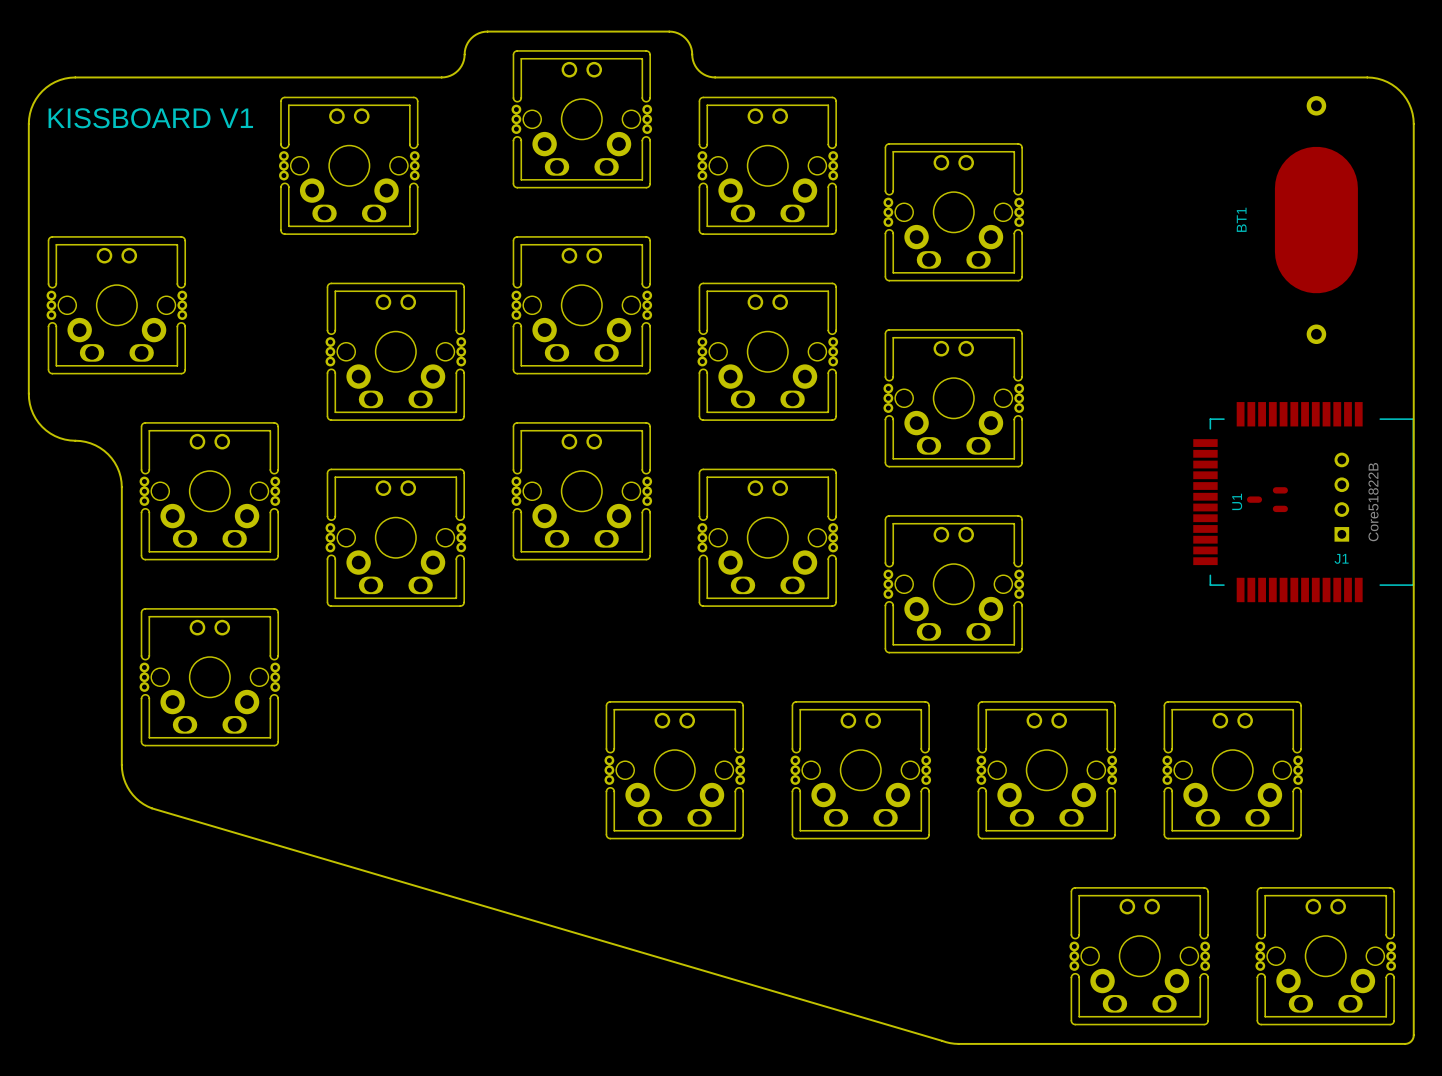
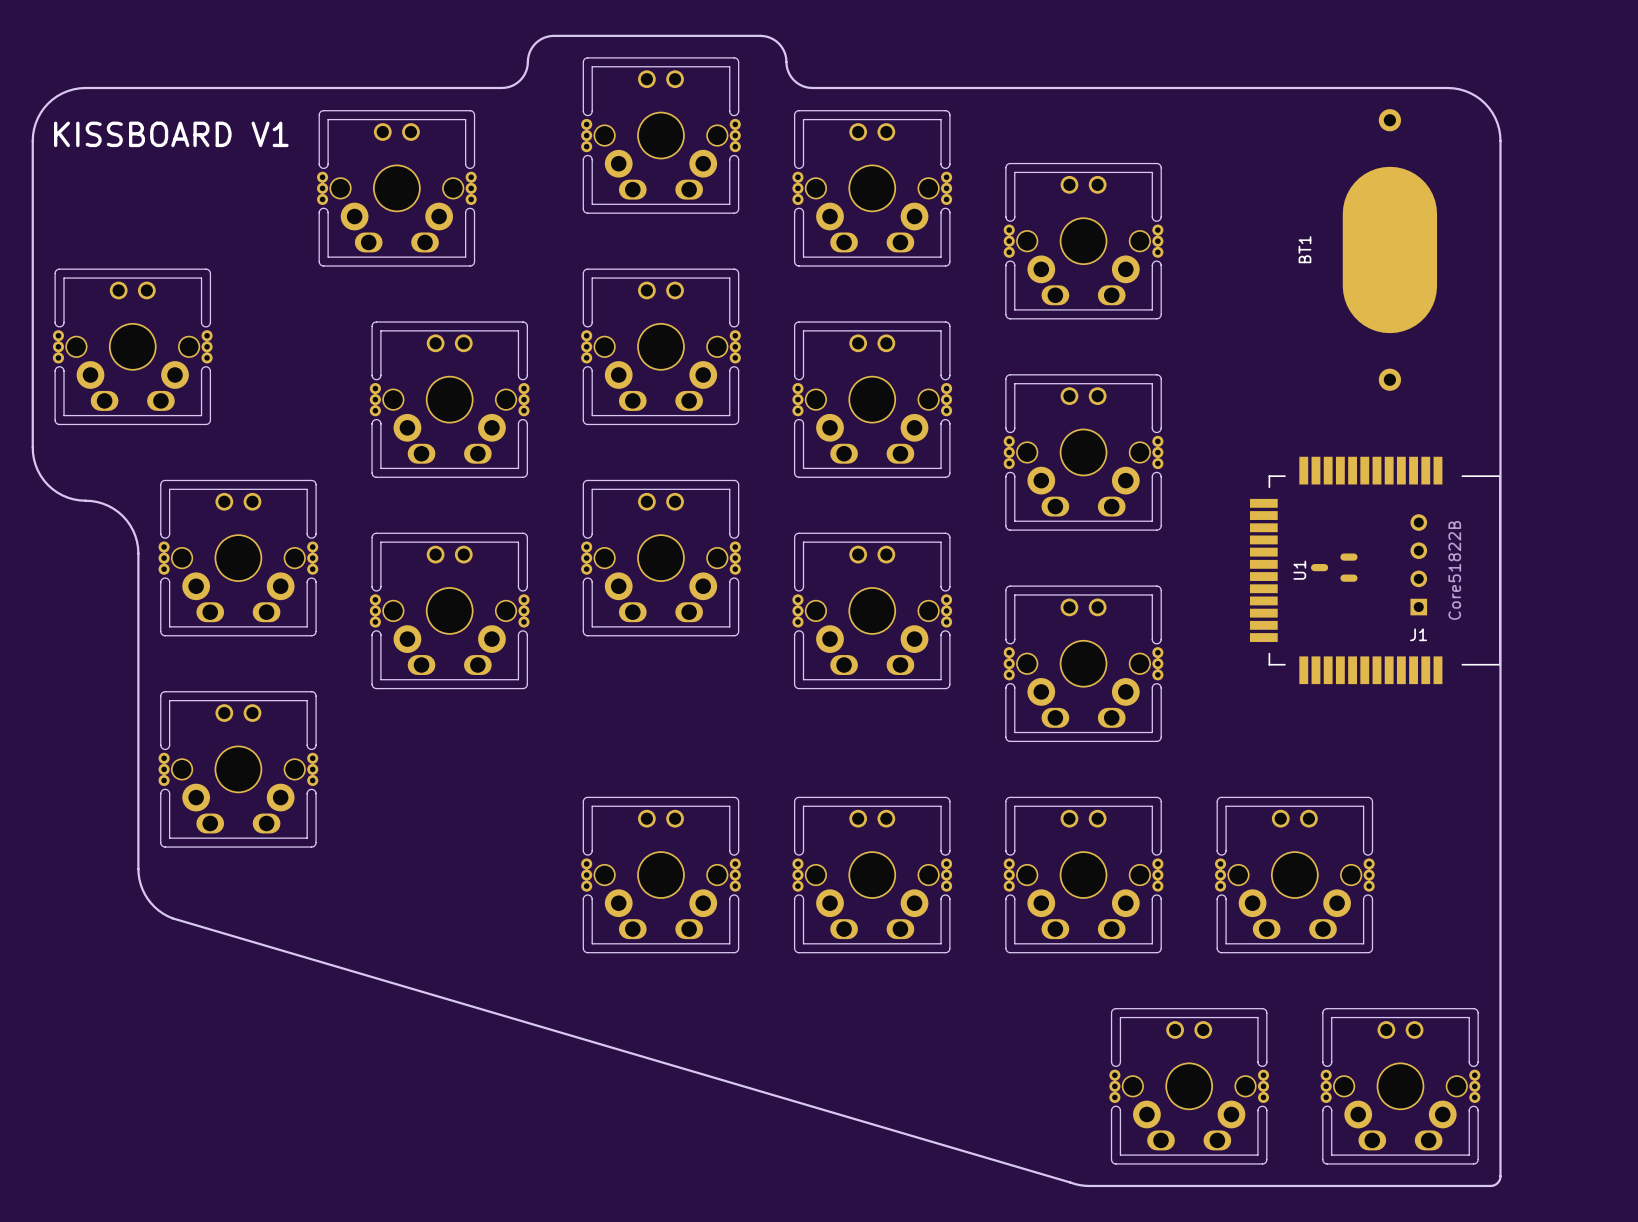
board edge: (1274, 77) (1367, 77) (1382, 80) (1396, 87) (1406, 99) (1411, 108) (1413, 123) (1413, 1036) (1411, 1041) (1406, 1043) (1312, 1043) -> (1447, 87) (1465, 90) (1485, 103) (1497, 123) (1500, 140) (1500, 1176) (1497, 1183) (1490, 1185)
BT1 position: (1316, 220) -> (1389, 249)
J1 position: (1341, 497) -> (1418, 564)
part position: (1267, 499) -> (1334, 567)
U1 position: (1303, 502) -> (1375, 570)
part: none -> (660, 875)
part: (674, 770) -> none
part: none -> (872, 875)
part: (860, 770) -> none
part: none -> (1083, 875)
part: (1046, 770) -> none
part: none -> (1294, 875)
part: (1232, 770) -> none
part: none -> (1189, 1086)
part: (1139, 956) -> none
part: none -> (1400, 1086)
part: (1325, 956) -> none

